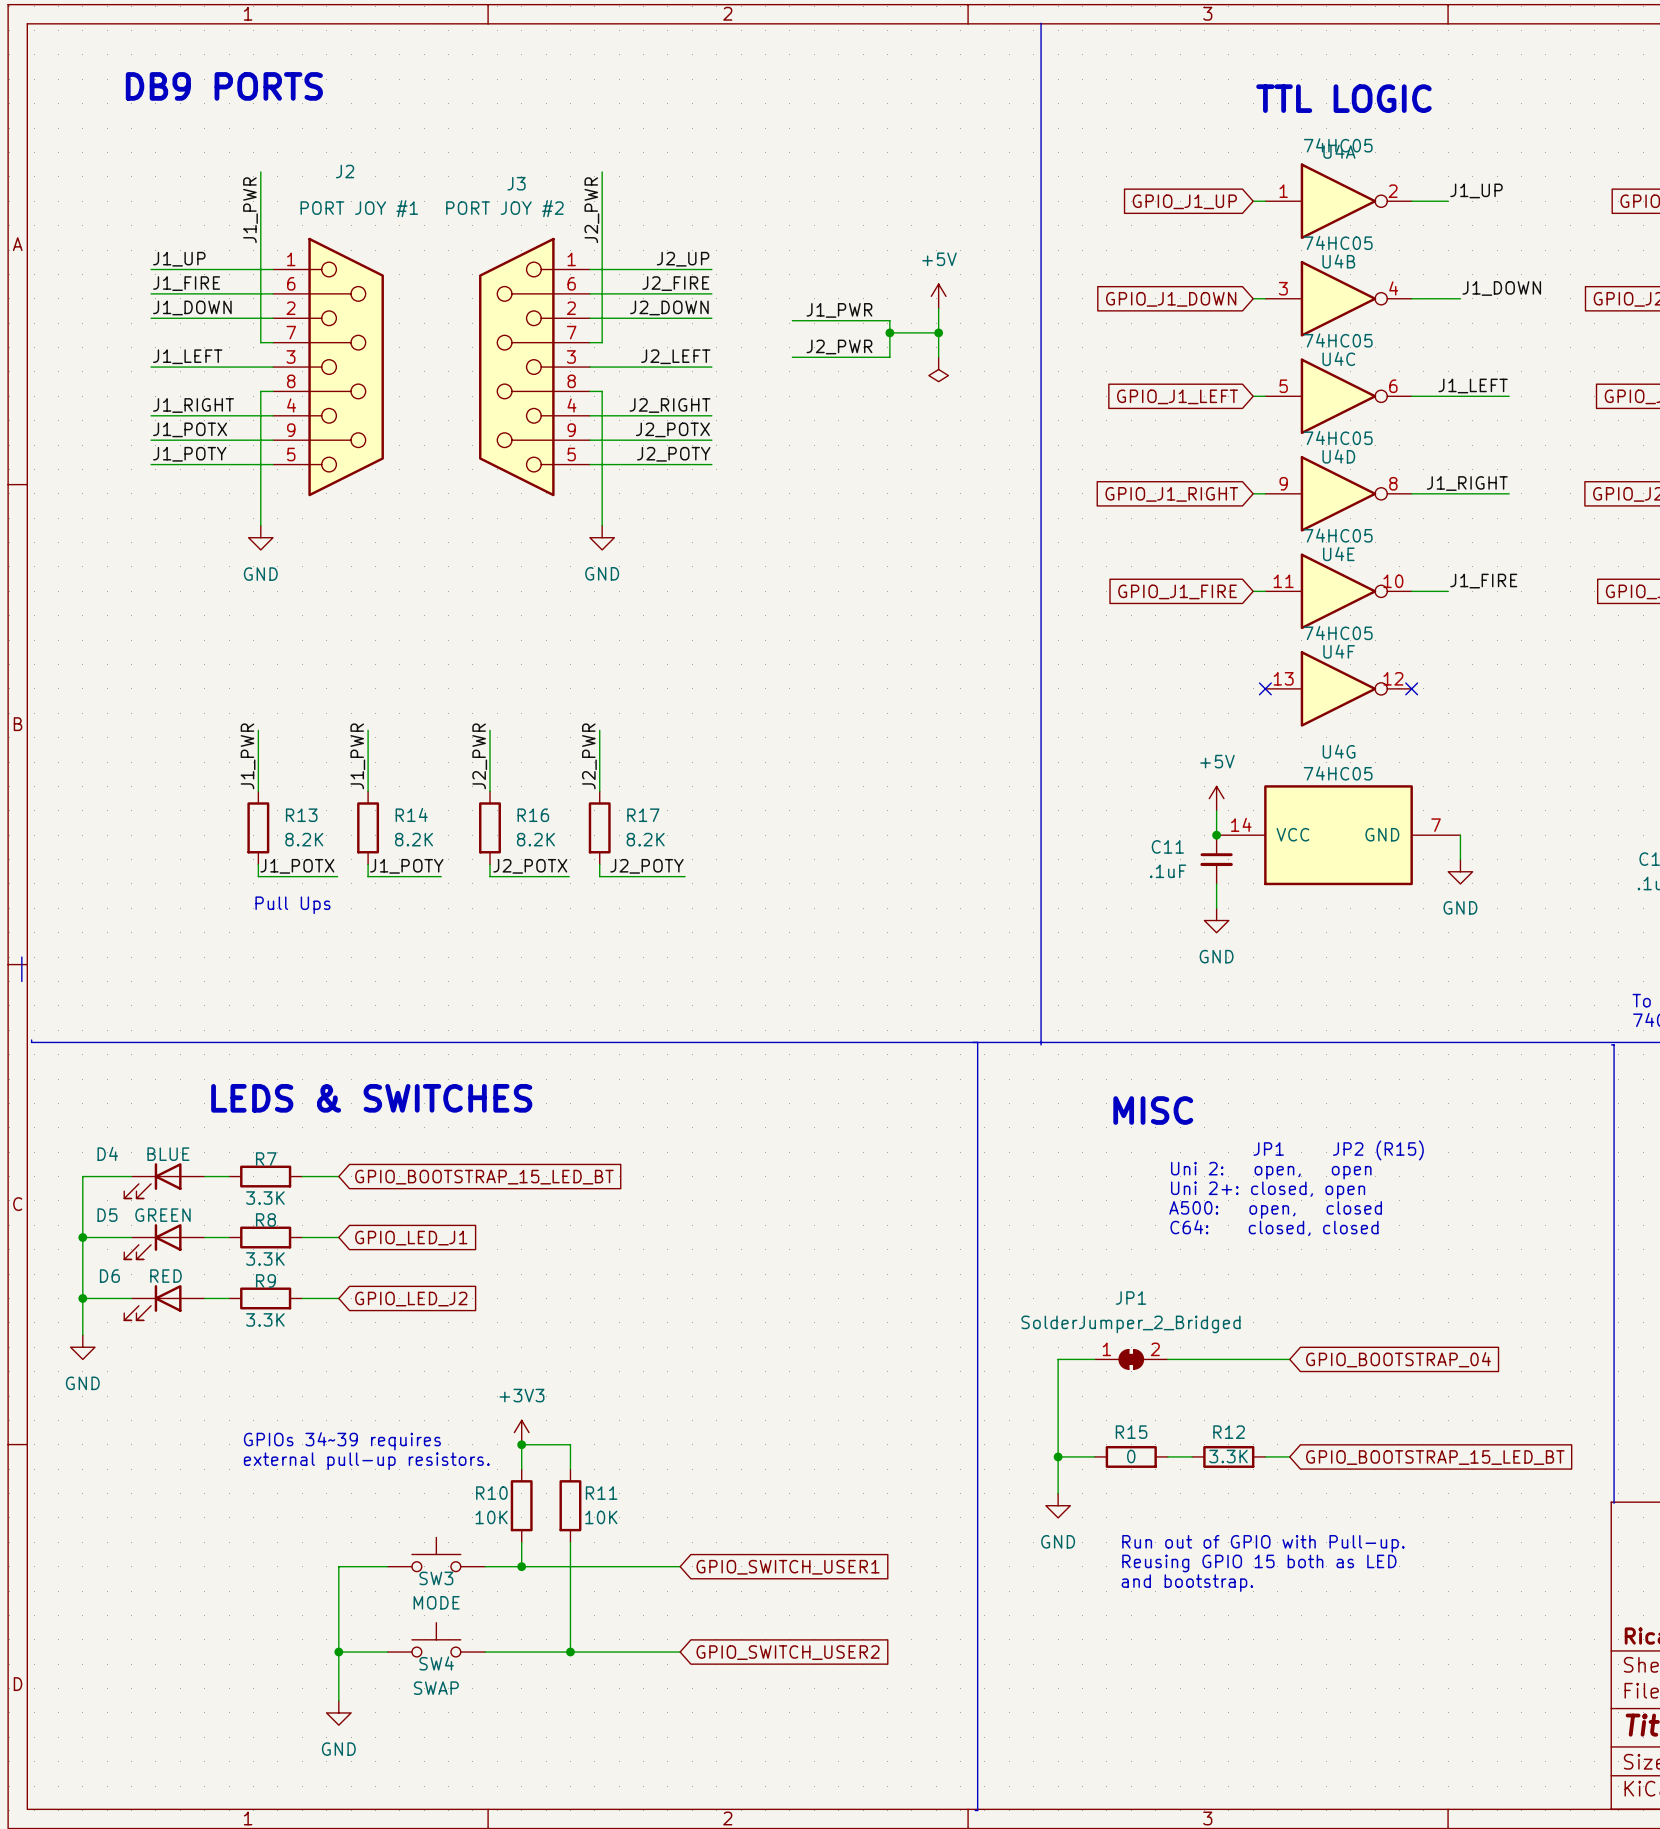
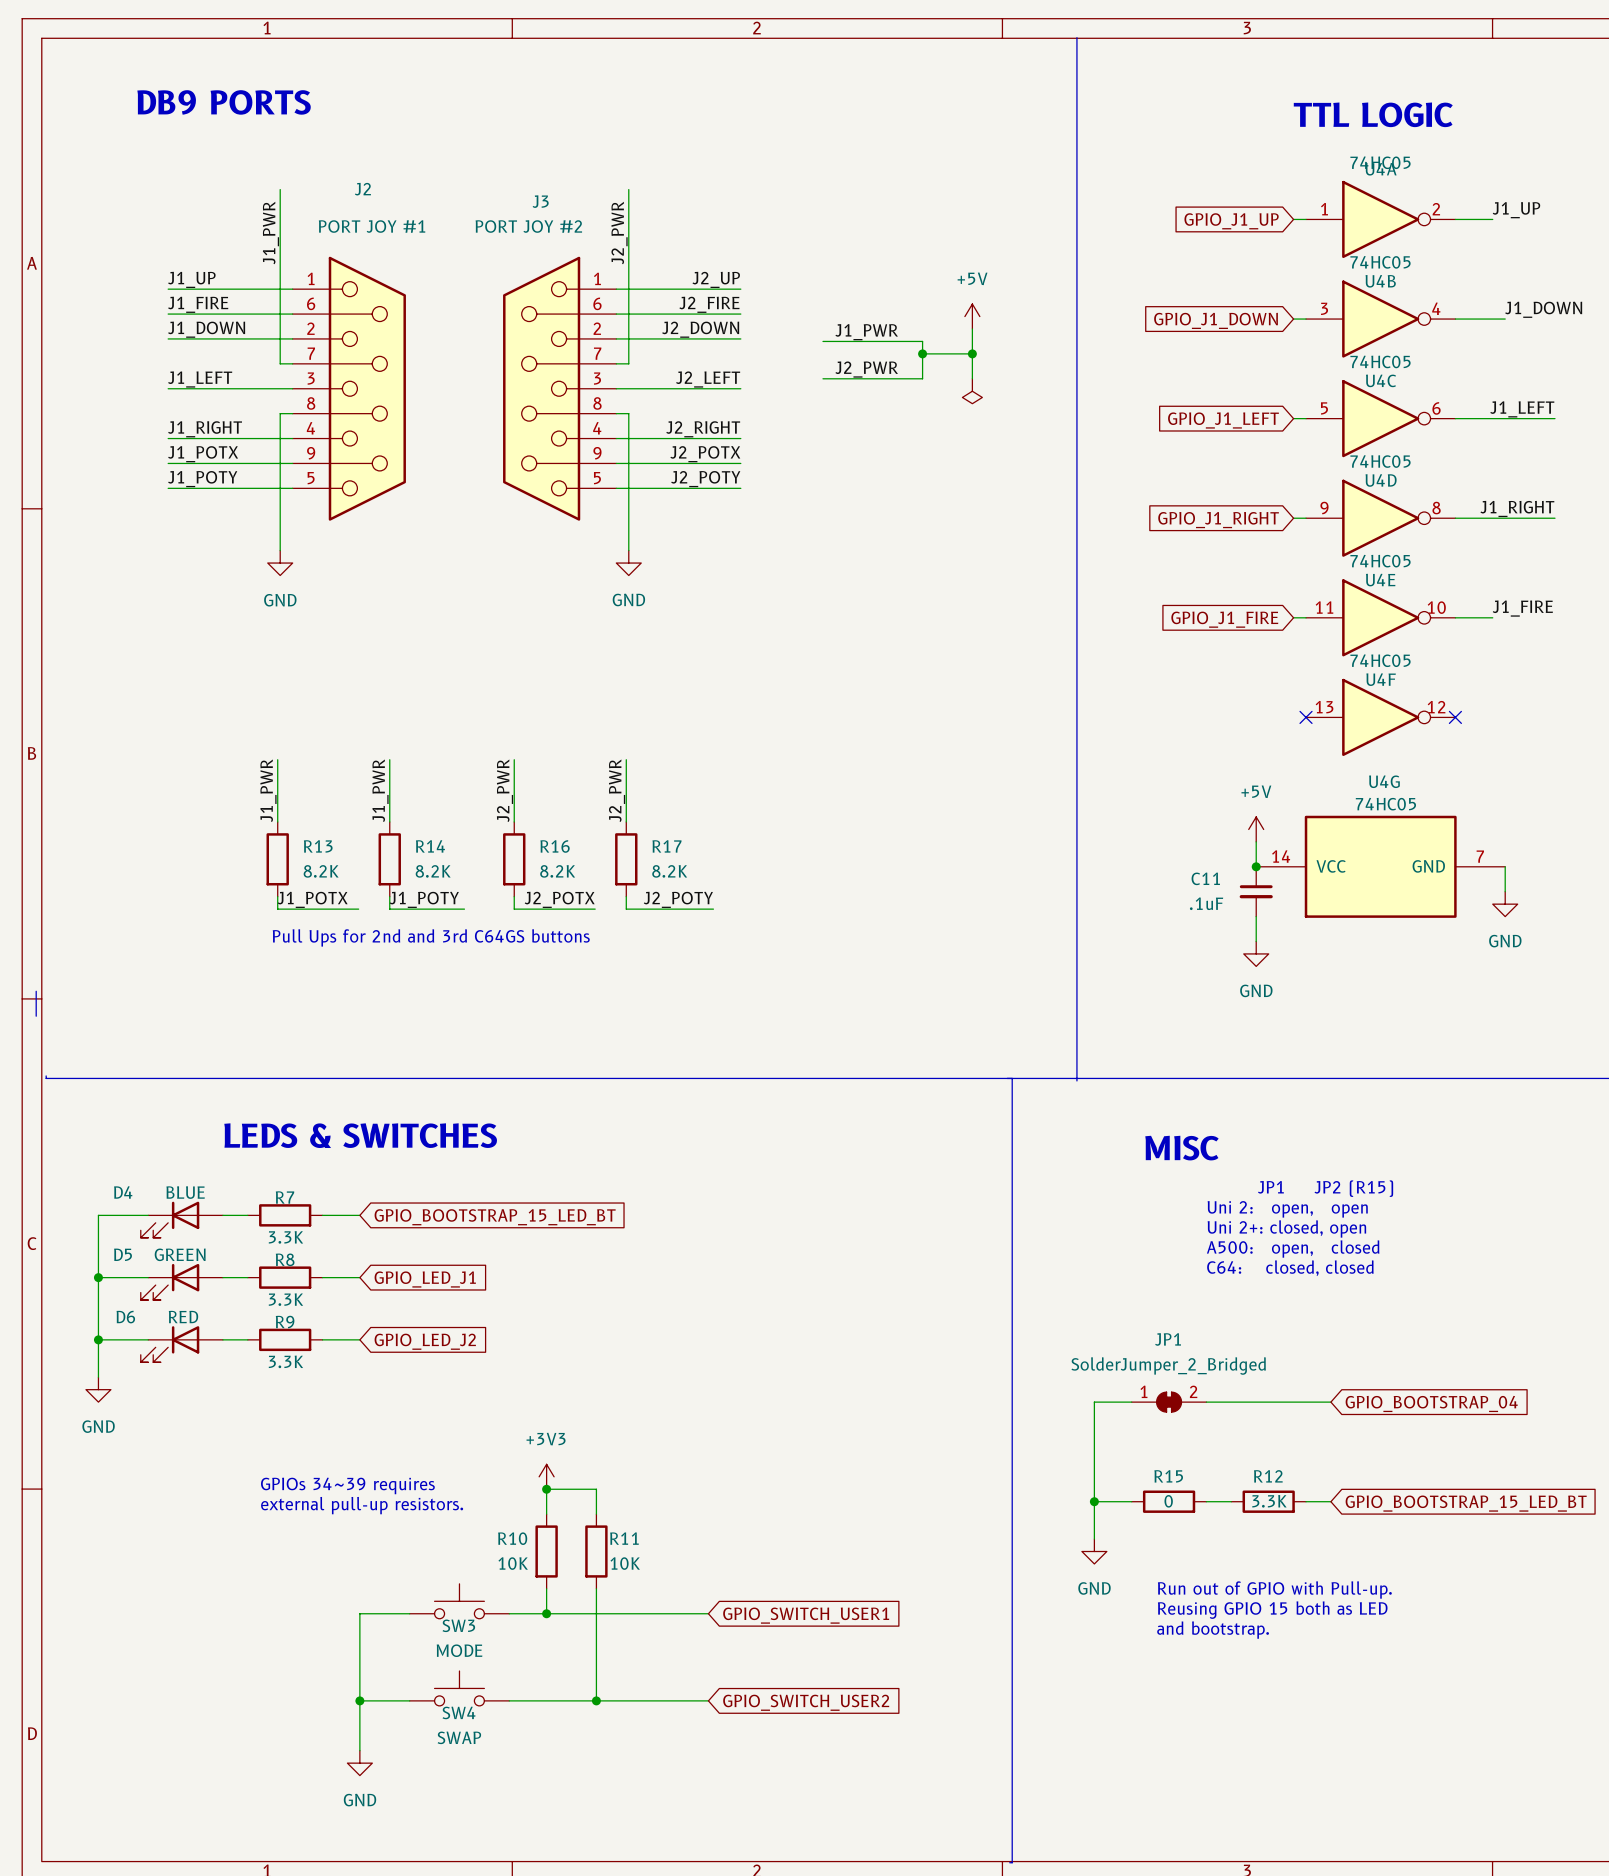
text: Pull Ups (292, 905) -> Pull Ups for 2nd and 3rd C64GS buttons (431, 937)

